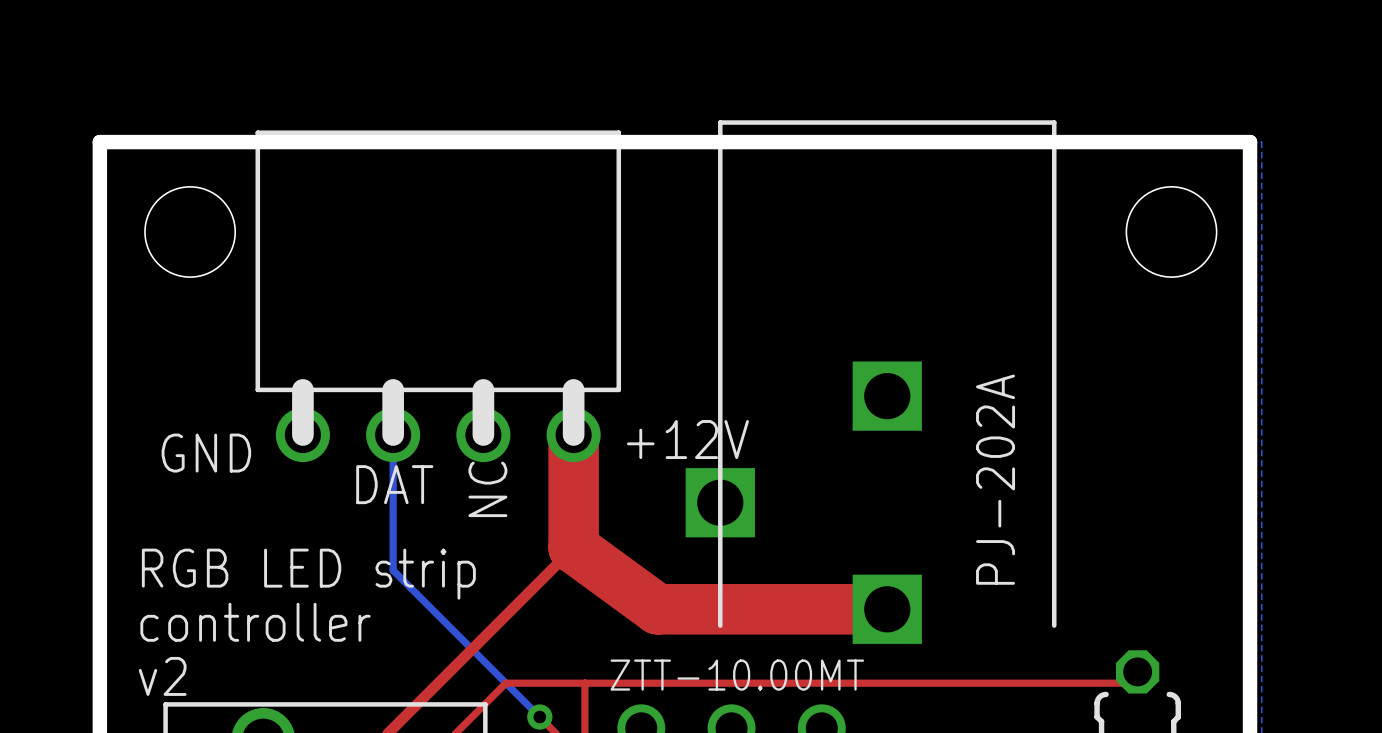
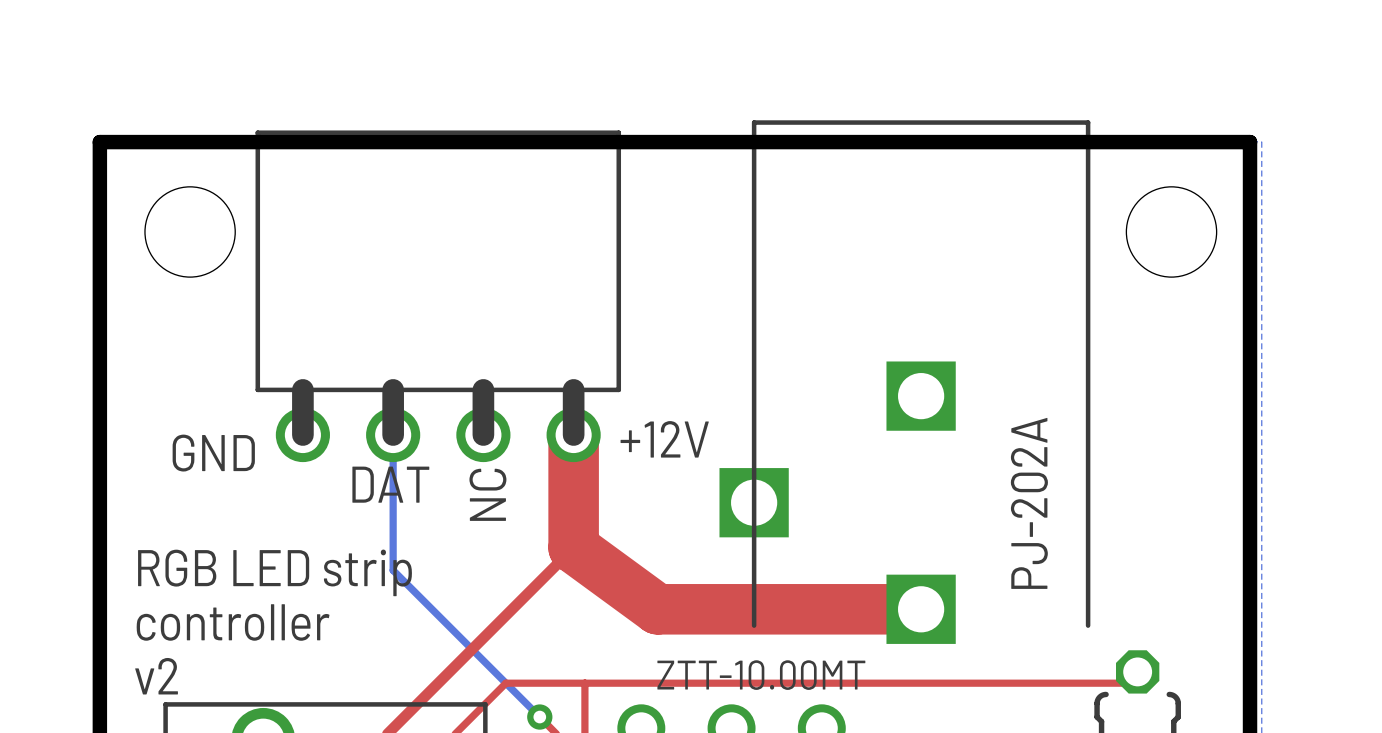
part position: (871, 382) -> (904, 382)

